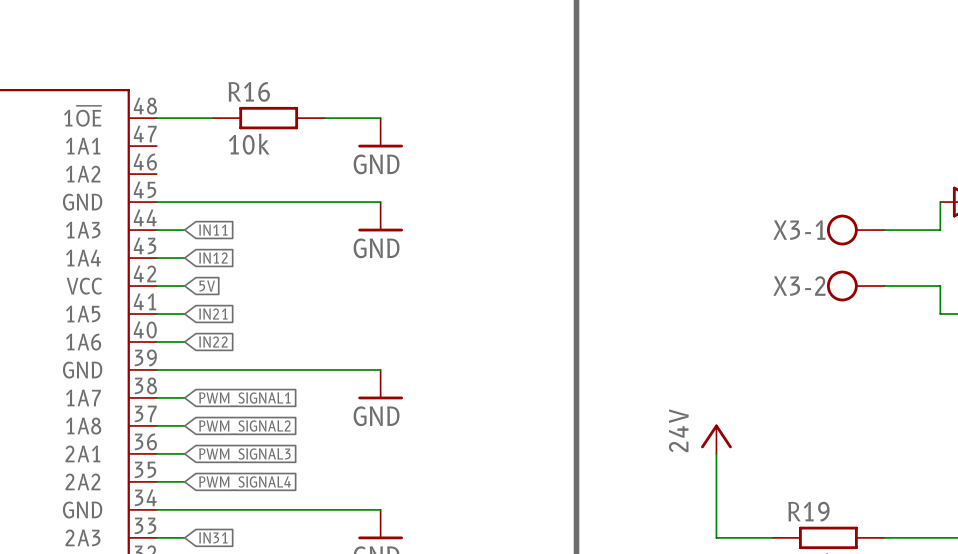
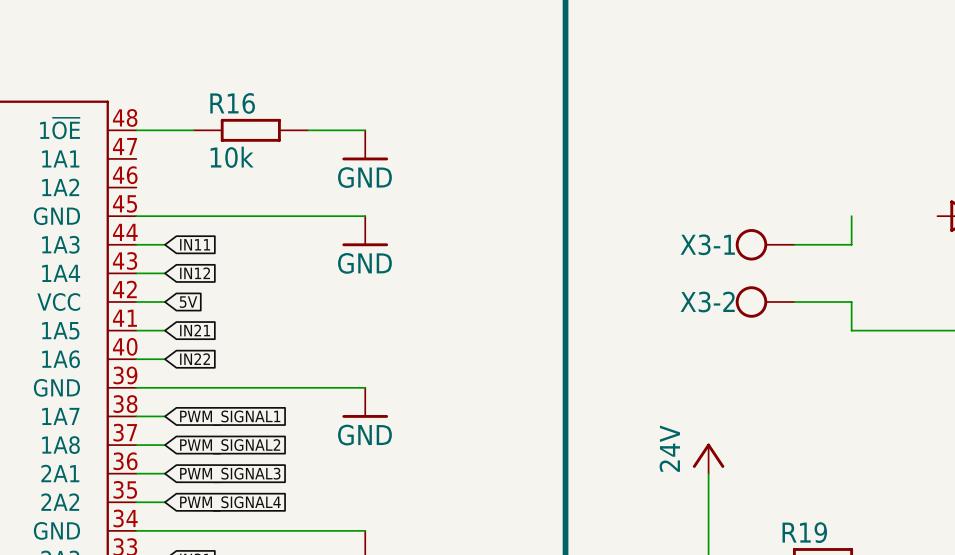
wire: (940, 202) (940, 230) (884, 230) -> (851, 216) (851, 244) (794, 244)
X3-1 position: (855, 230) -> (765, 244)
X3-2 position: (855, 286) -> (765, 302)
wire: (884, 286) (940, 286) (940, 314) -> (794, 302) (851, 302) (851, 330) (937, 330)

